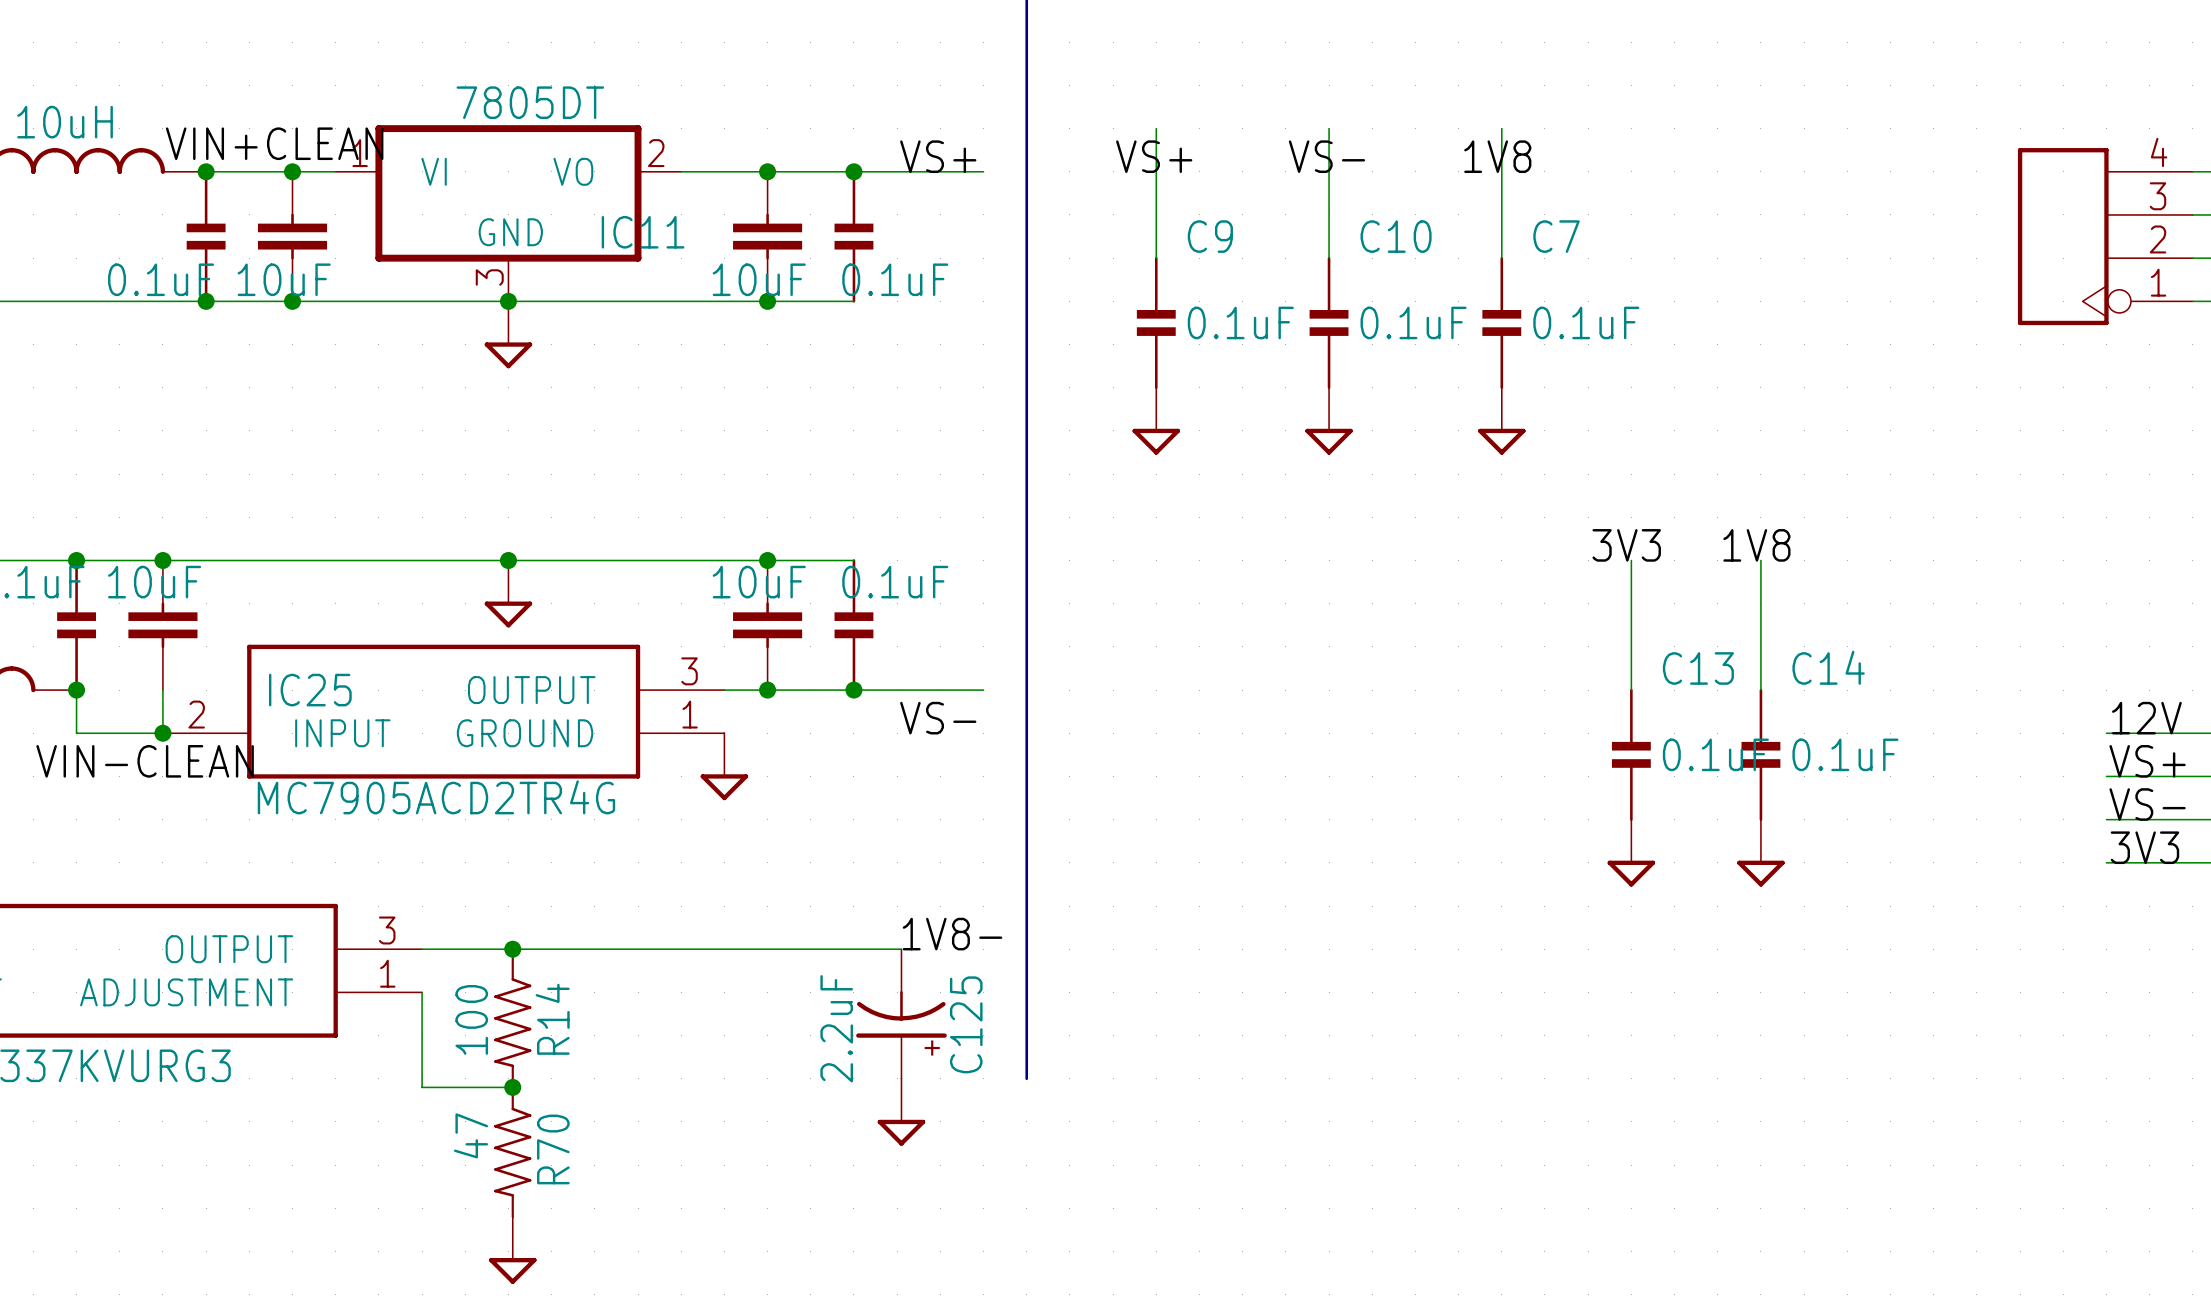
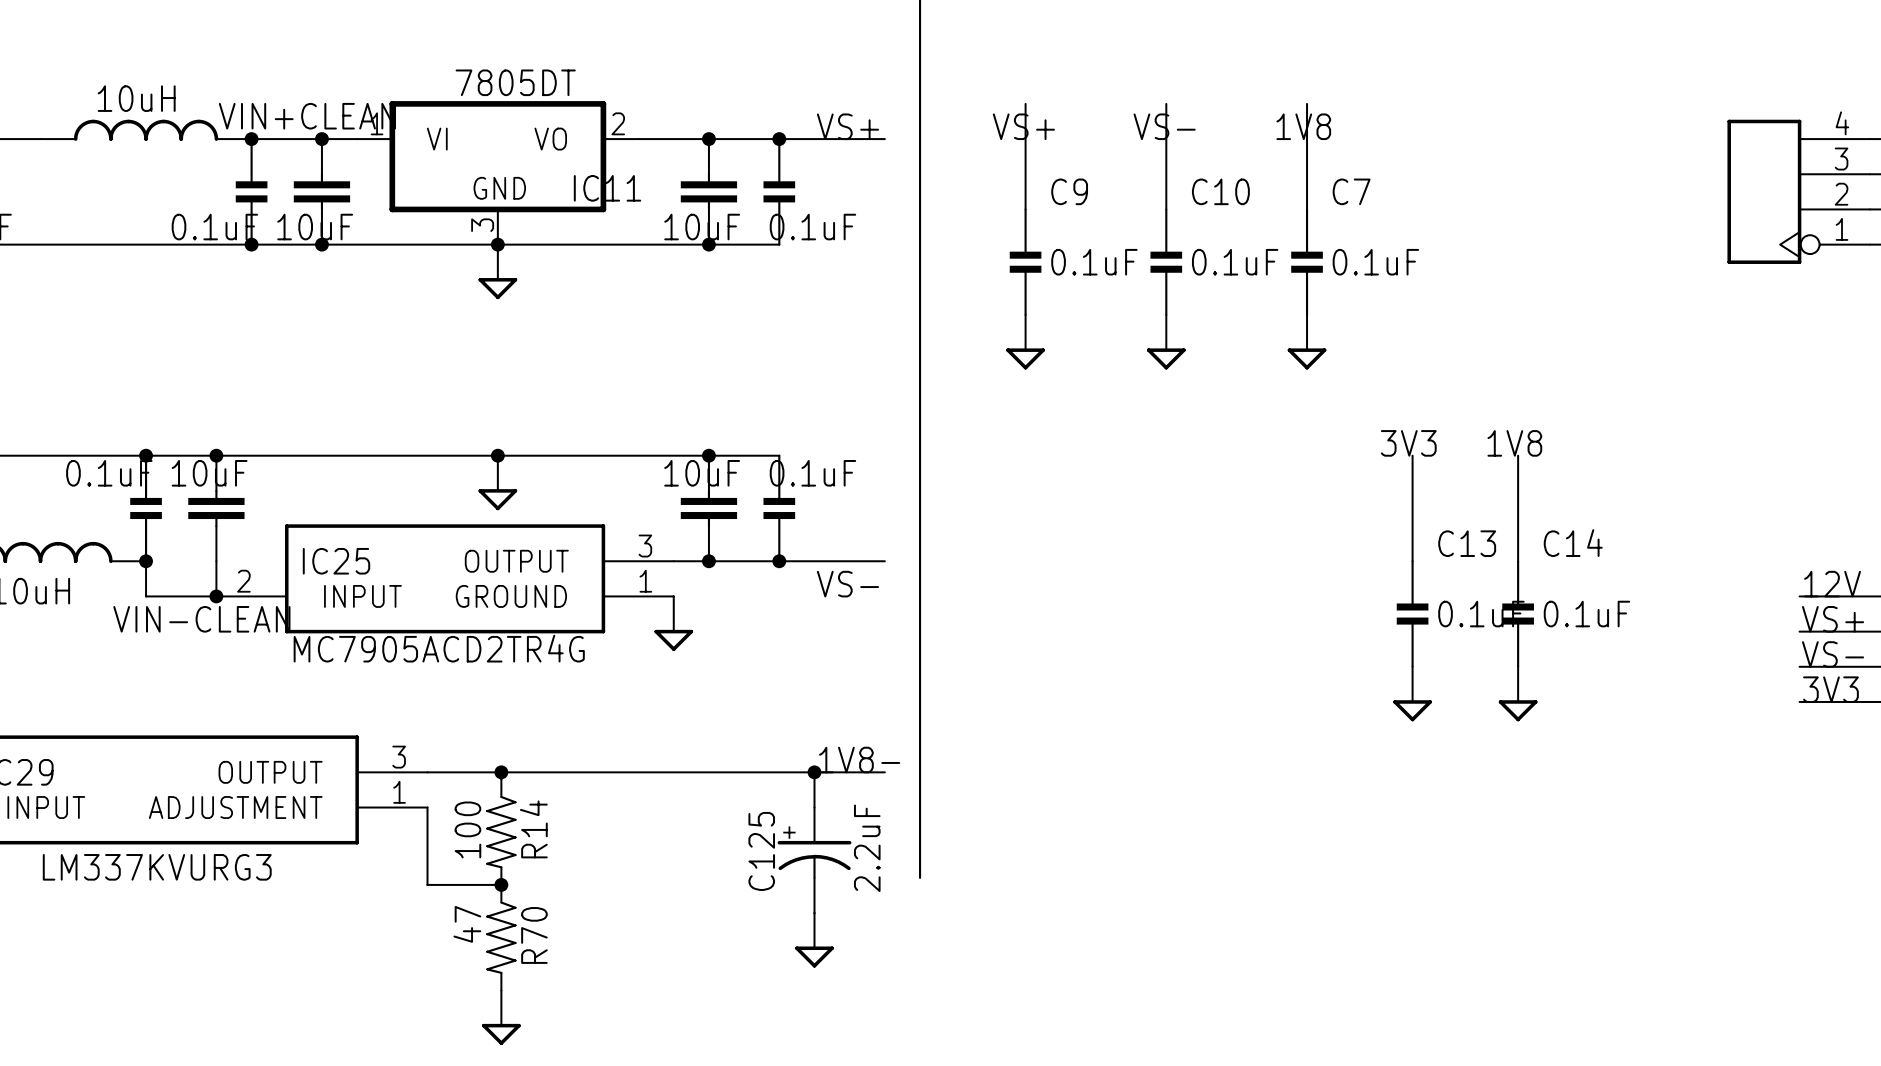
wire: none -> (814, 772) (814, 807)
junction: none -> (814, 772)
wire: none -> (818, 772) (884, 772)
C125 rotation: 0° (901, 1023) -> 180° (814, 852)
power symbol position: (901, 1112) -> (814, 940)

